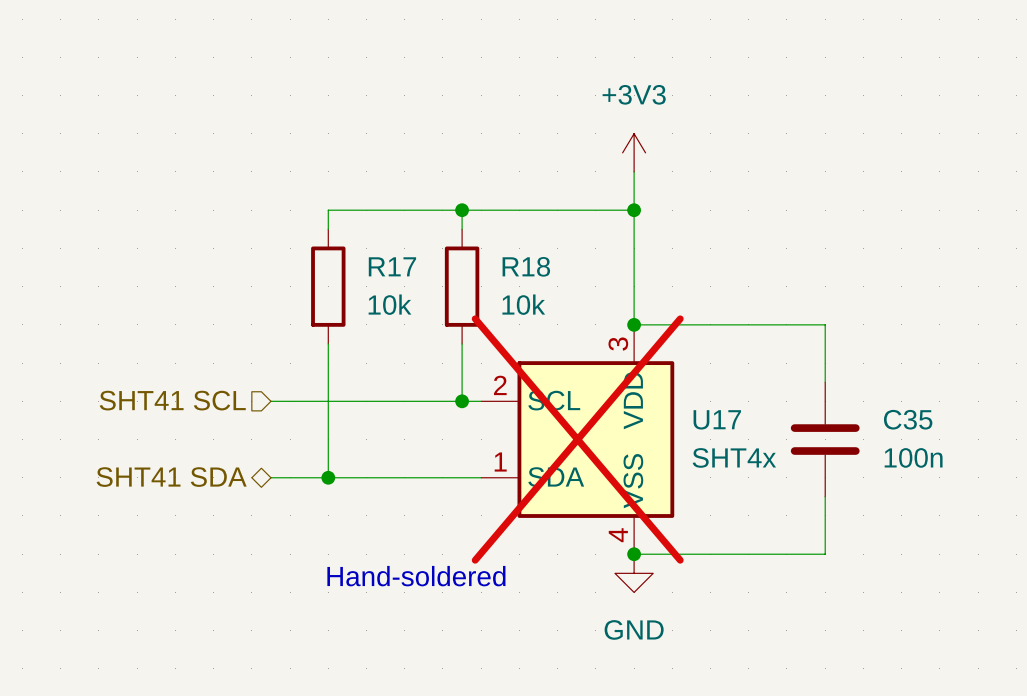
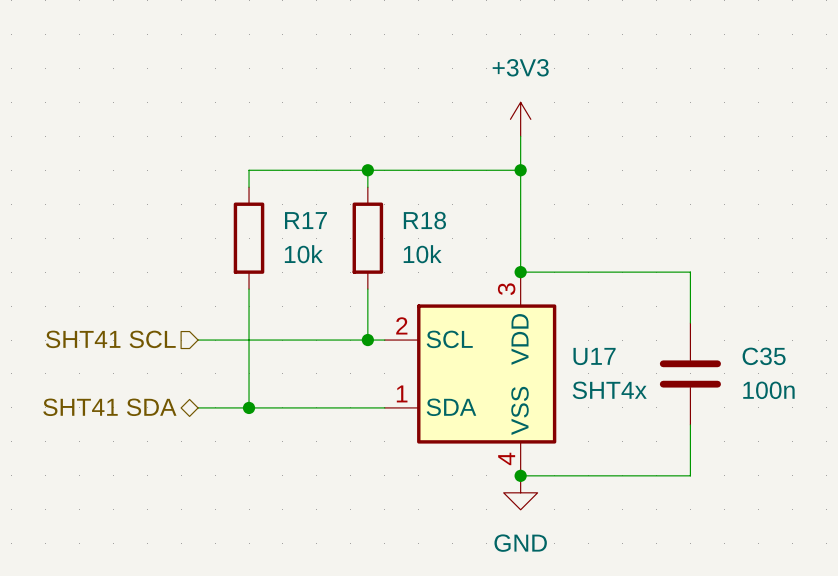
U17 do-not-place cross: (577, 439) -> none
text: Hand-soldered (416, 576) -> none

